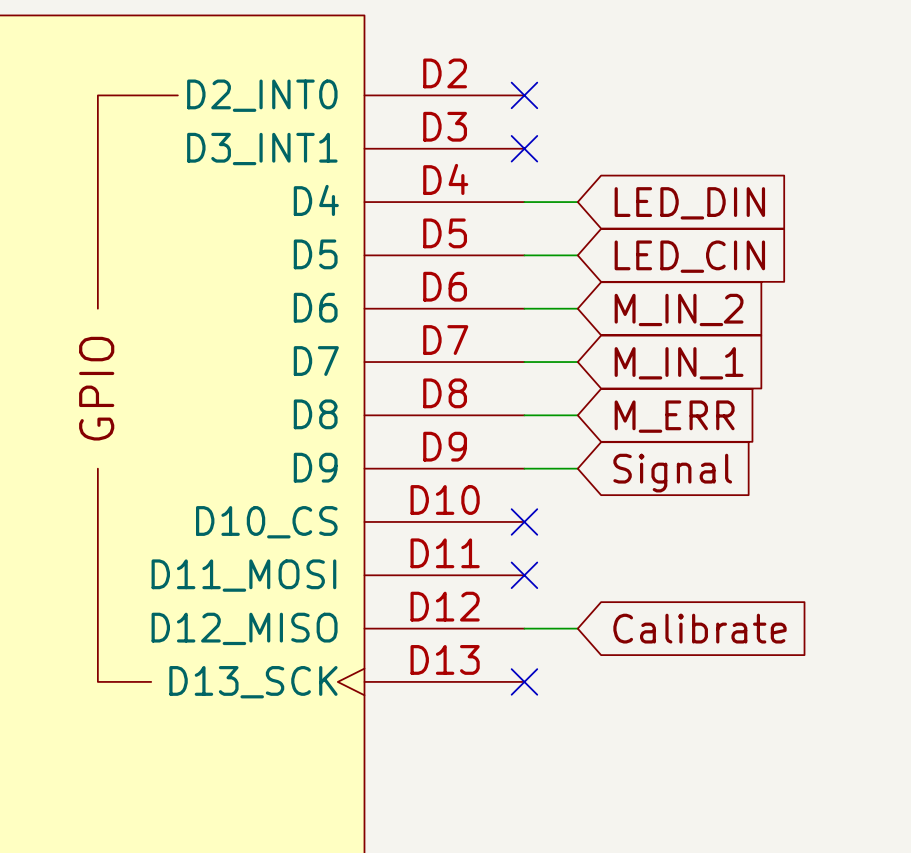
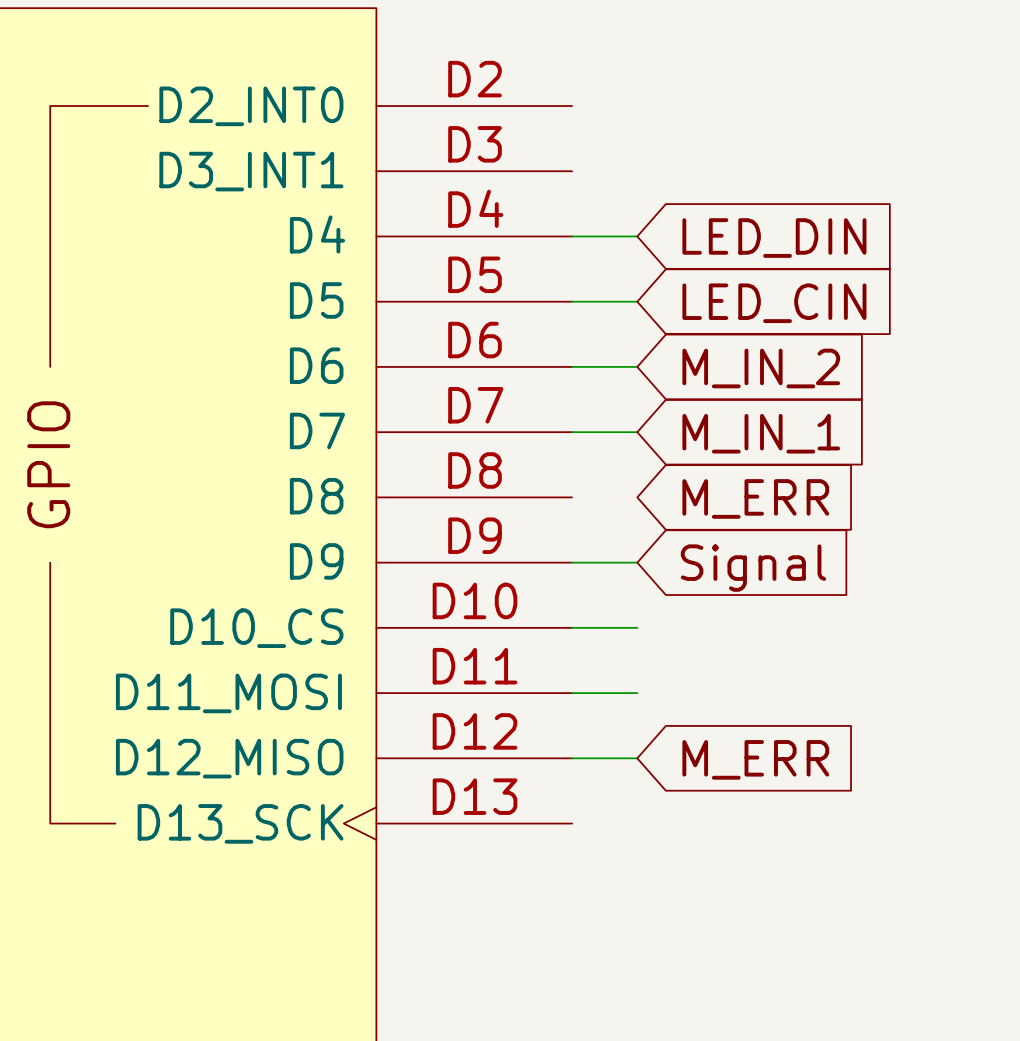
no-connect mark: (524, 95) -> none
no-connect mark: (524, 148) -> none
wire: (524, 415) (577, 415) -> (572, 627) (637, 627)
no-connect mark: (524, 521) -> none
wire: none -> (572, 693) (637, 693)
no-connect mark: (524, 575) -> none
global label: Calibrate (700, 628) -> M_ERR (755, 759)
no-connect mark: (524, 681) -> none

